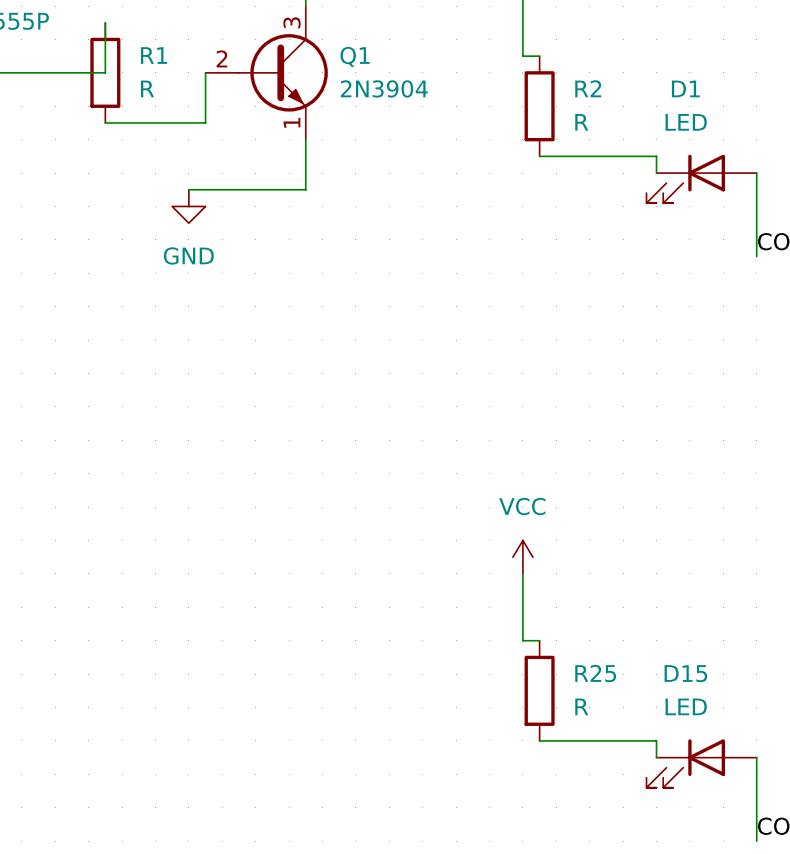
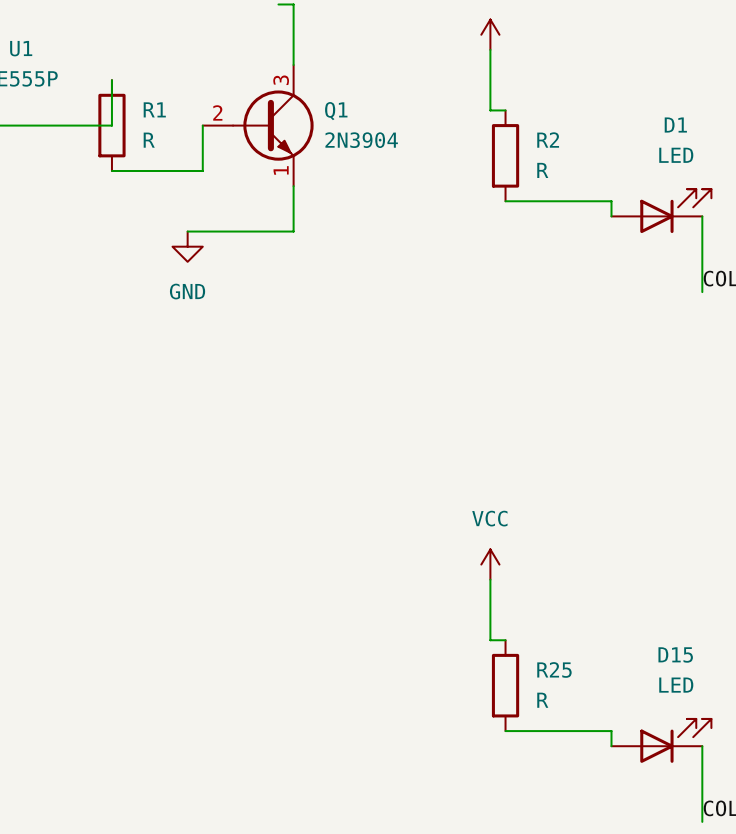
D1 name position: D1 (685, 88) -> D1 (675, 125)
D1 value position: LED (686, 122) -> LED (676, 155)
D1 rotation: 0° (685, 178) -> 180° (675, 211)
D15 name position: D15 (685, 673) -> D15 (675, 654)
D15 value position: LED (686, 706) -> LED (676, 685)
D15 rotation: 0° (685, 763) -> 180° (675, 740)

